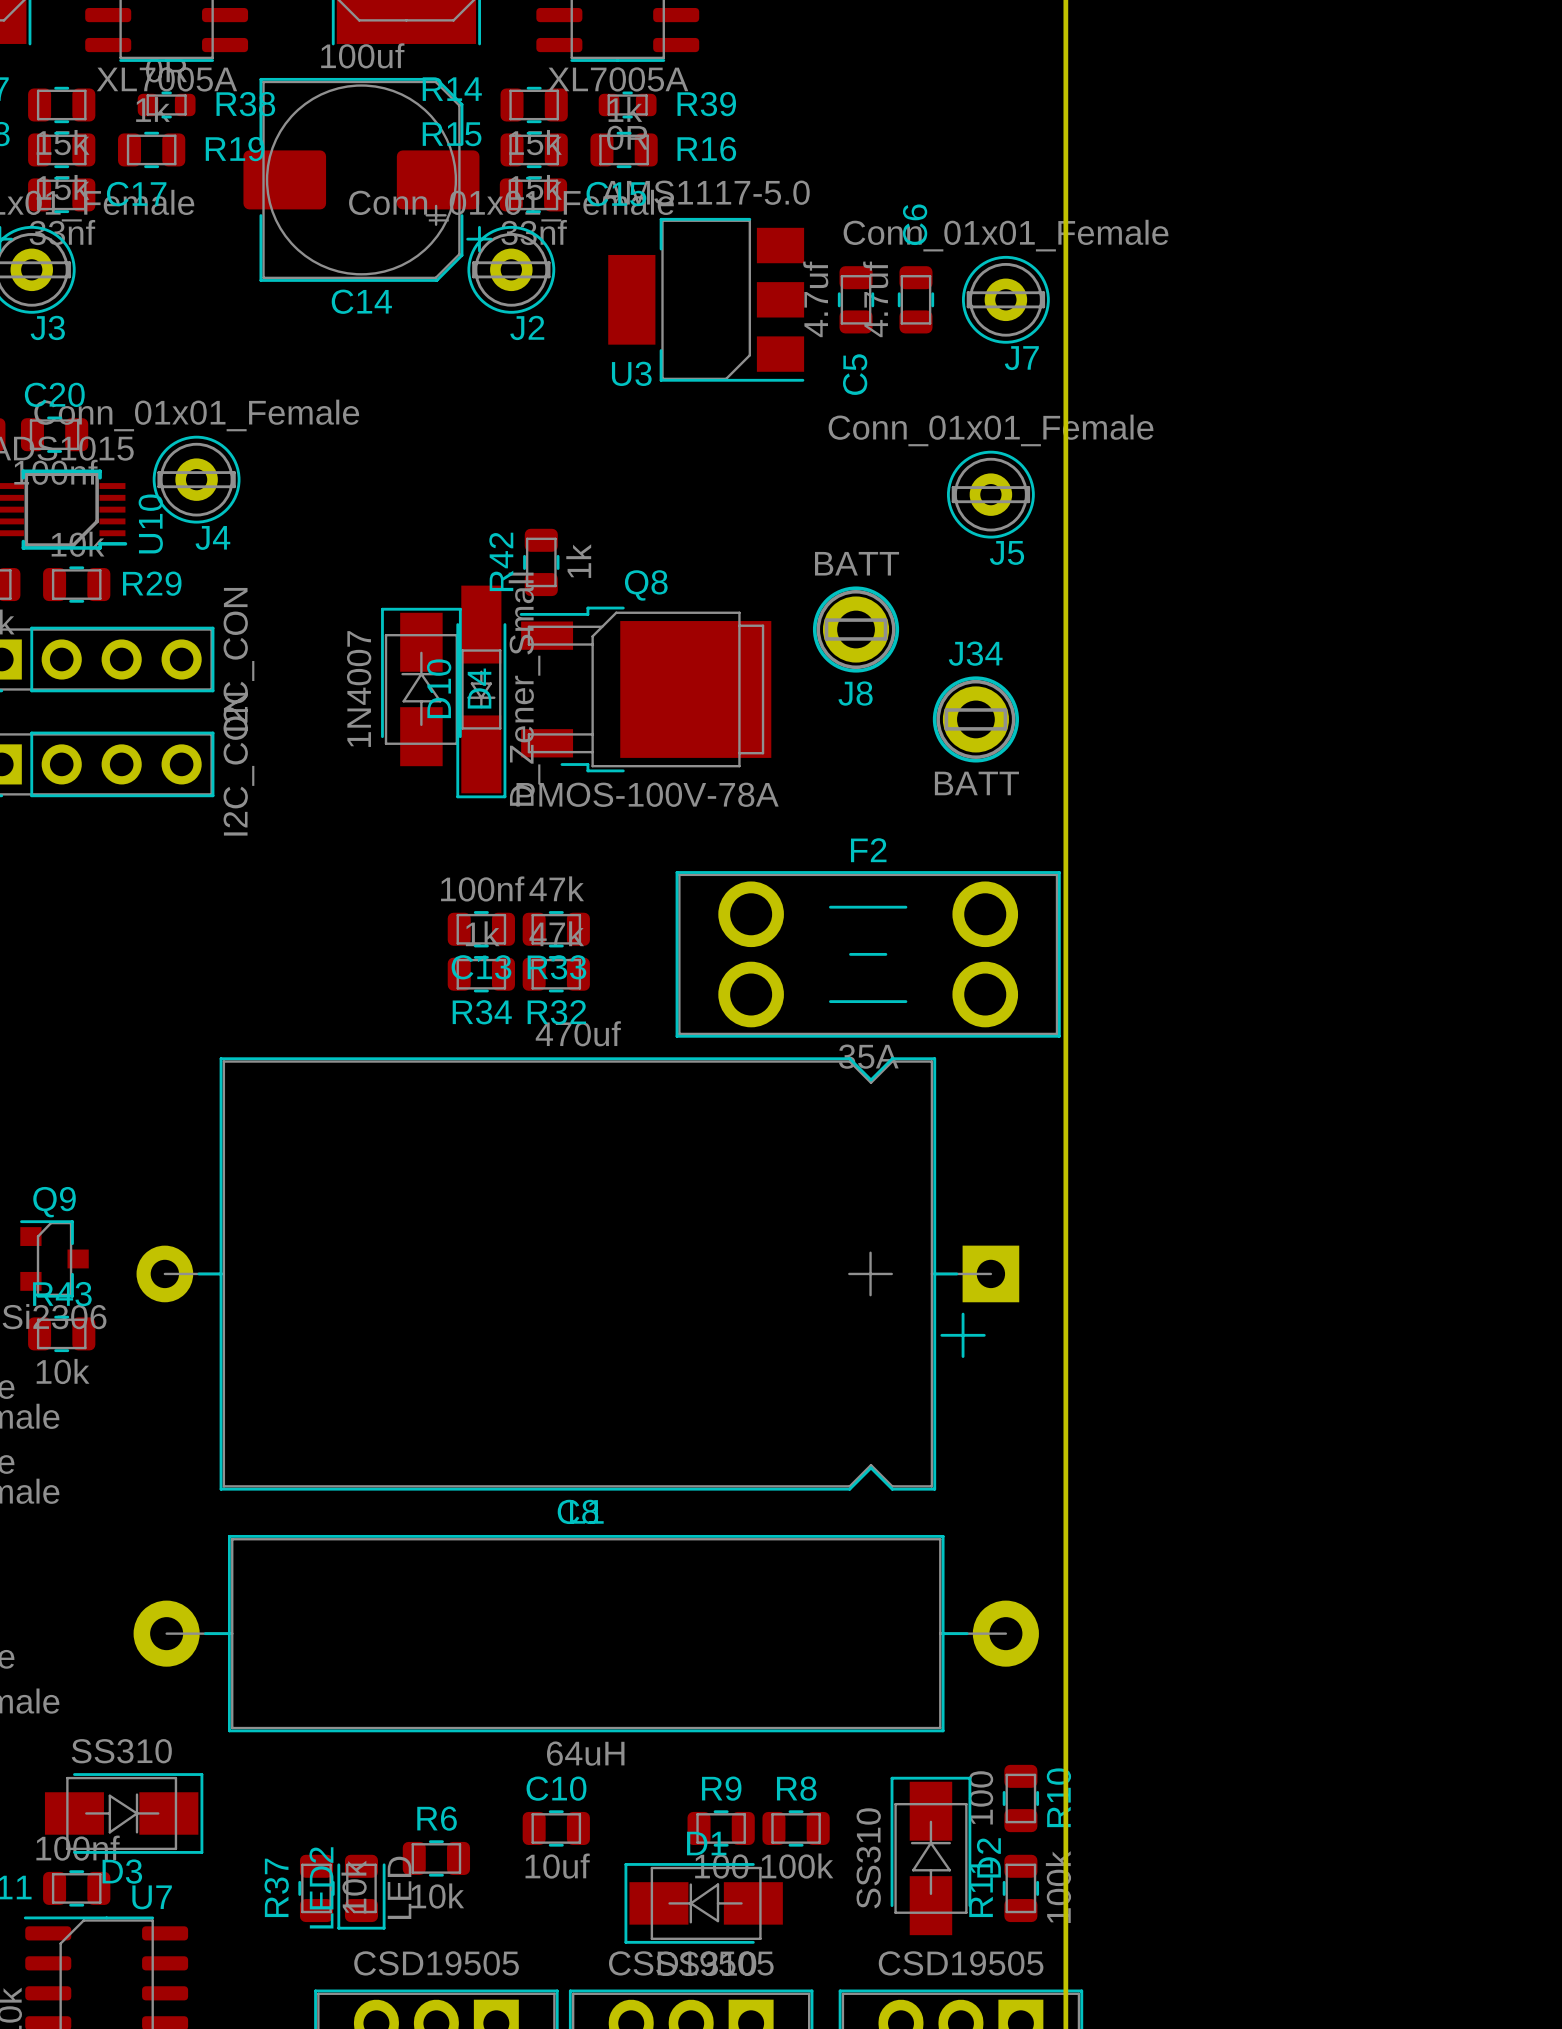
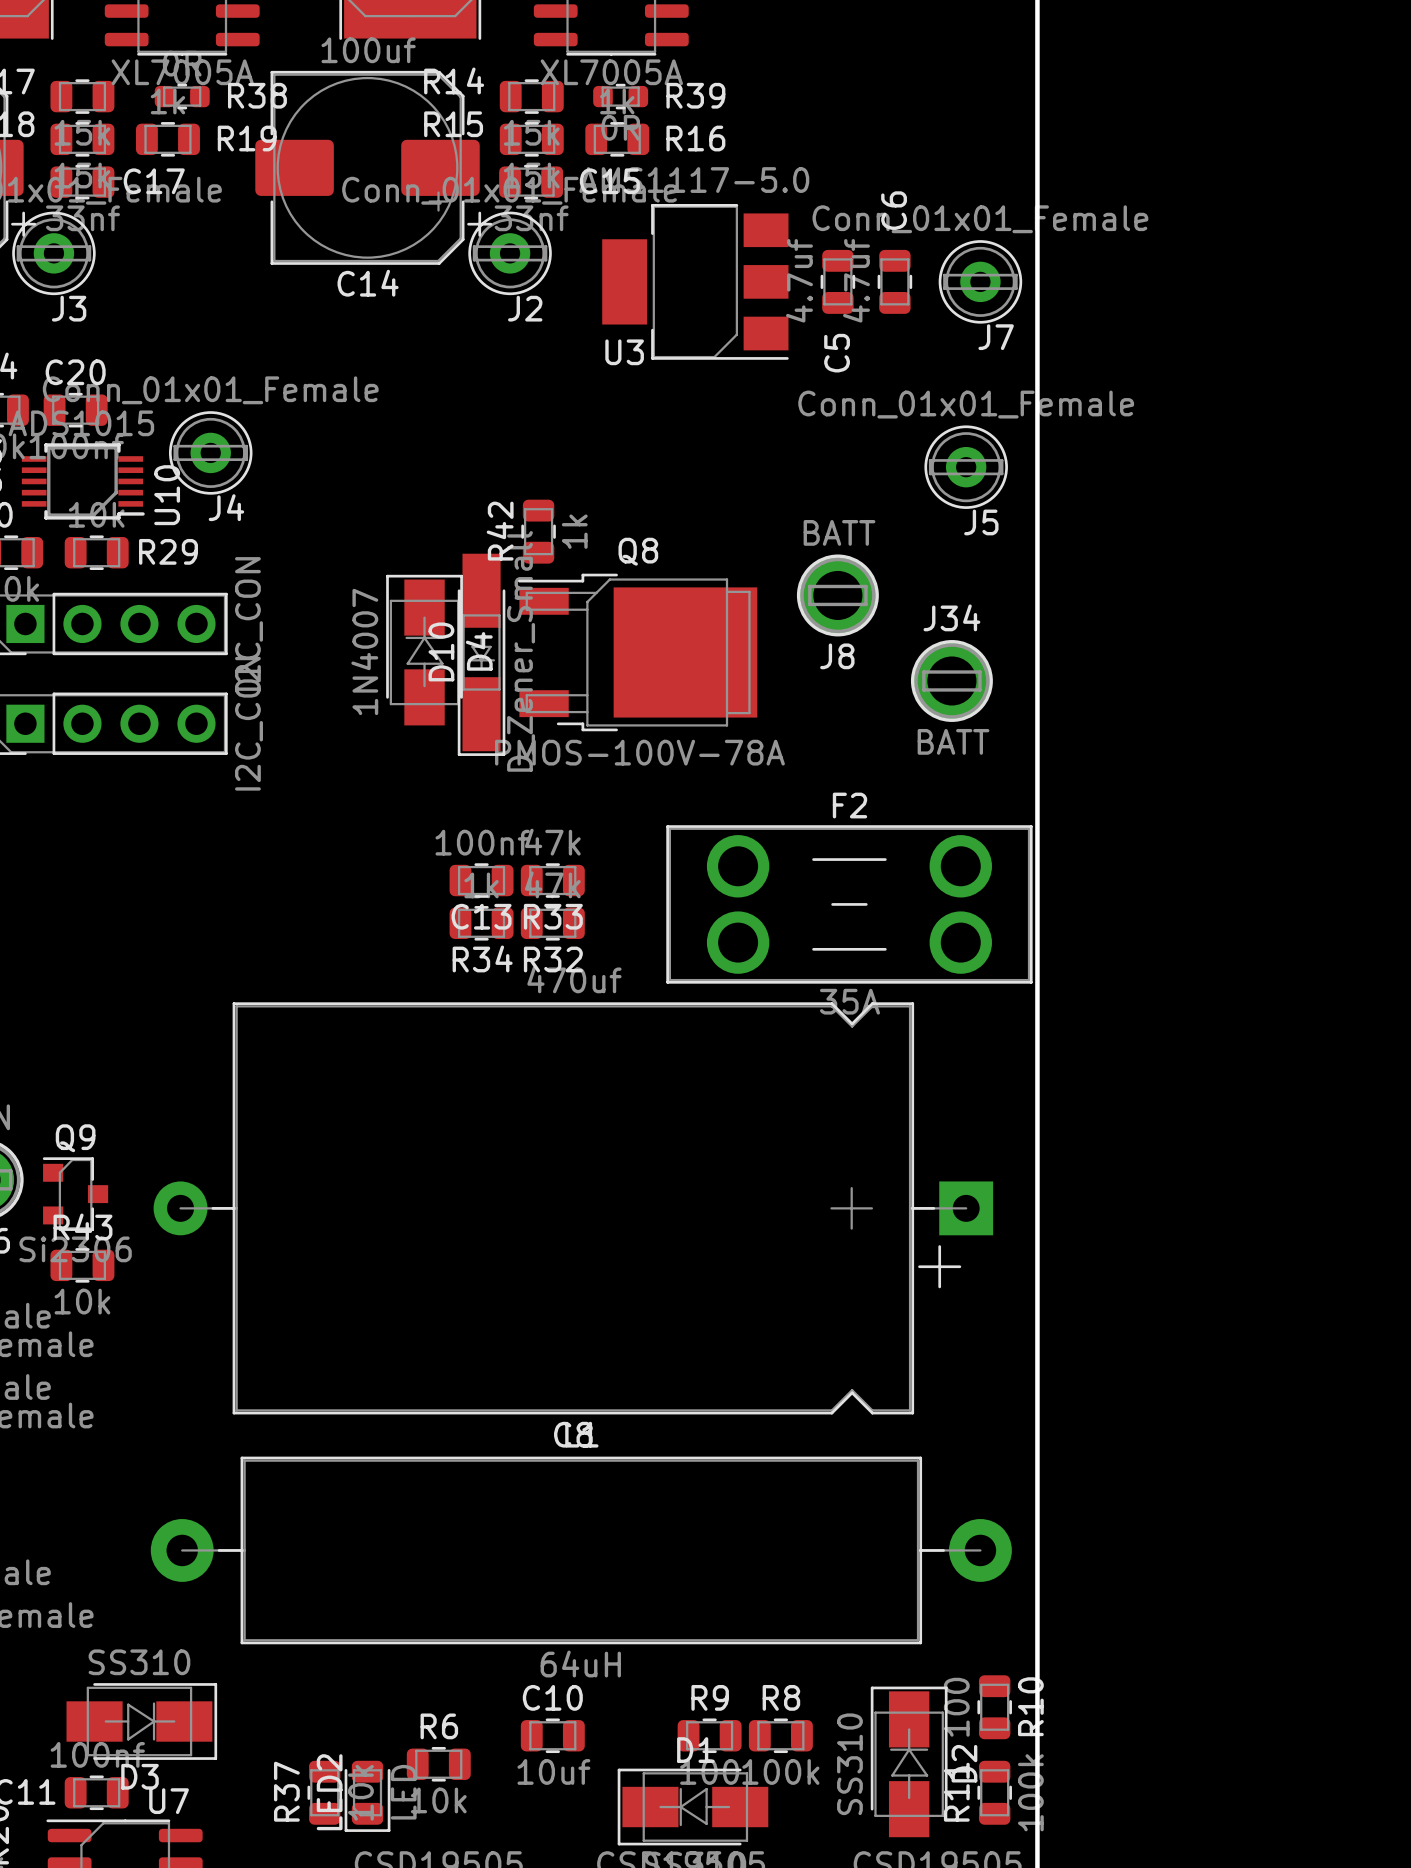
J8 footprint: [812, 586, 900, 673] -> [796, 554, 879, 637]
J34 footprint: [932, 676, 1019, 763] -> [910, 640, 993, 722]

